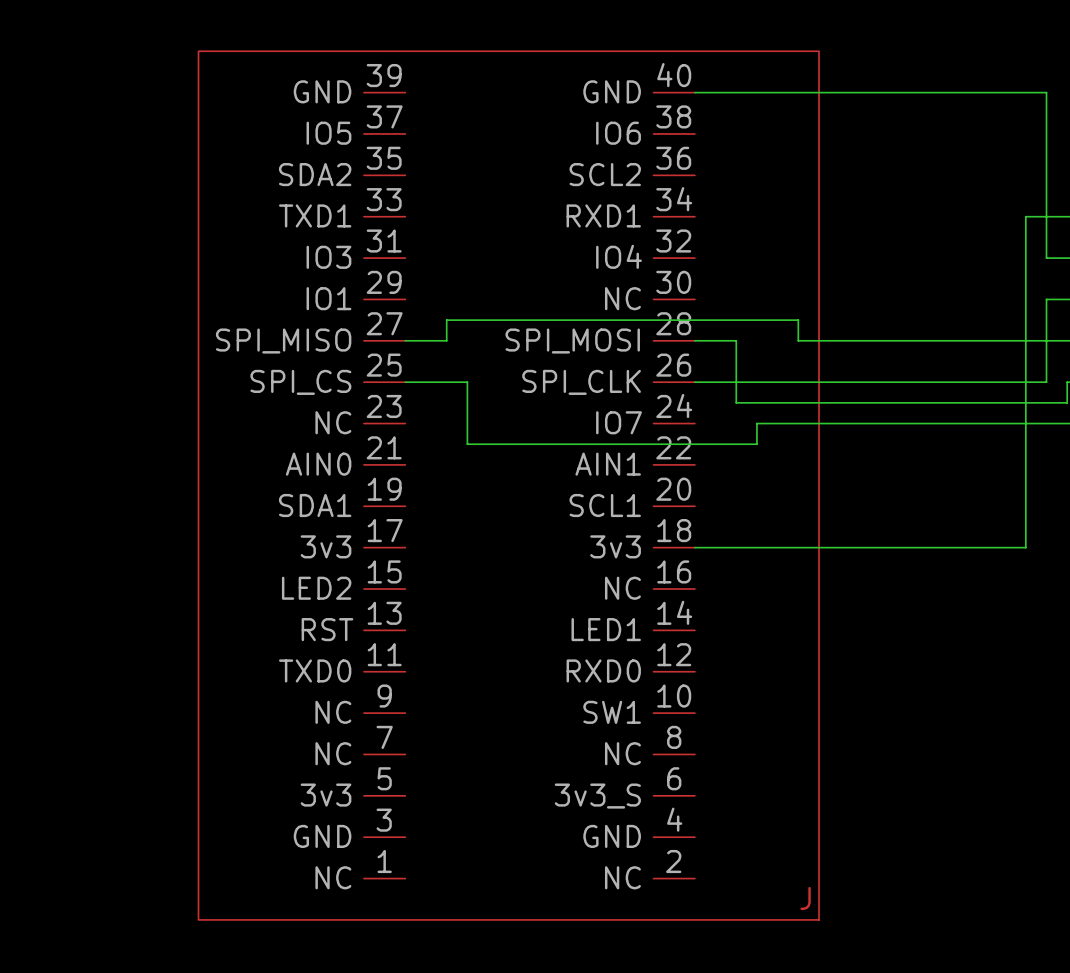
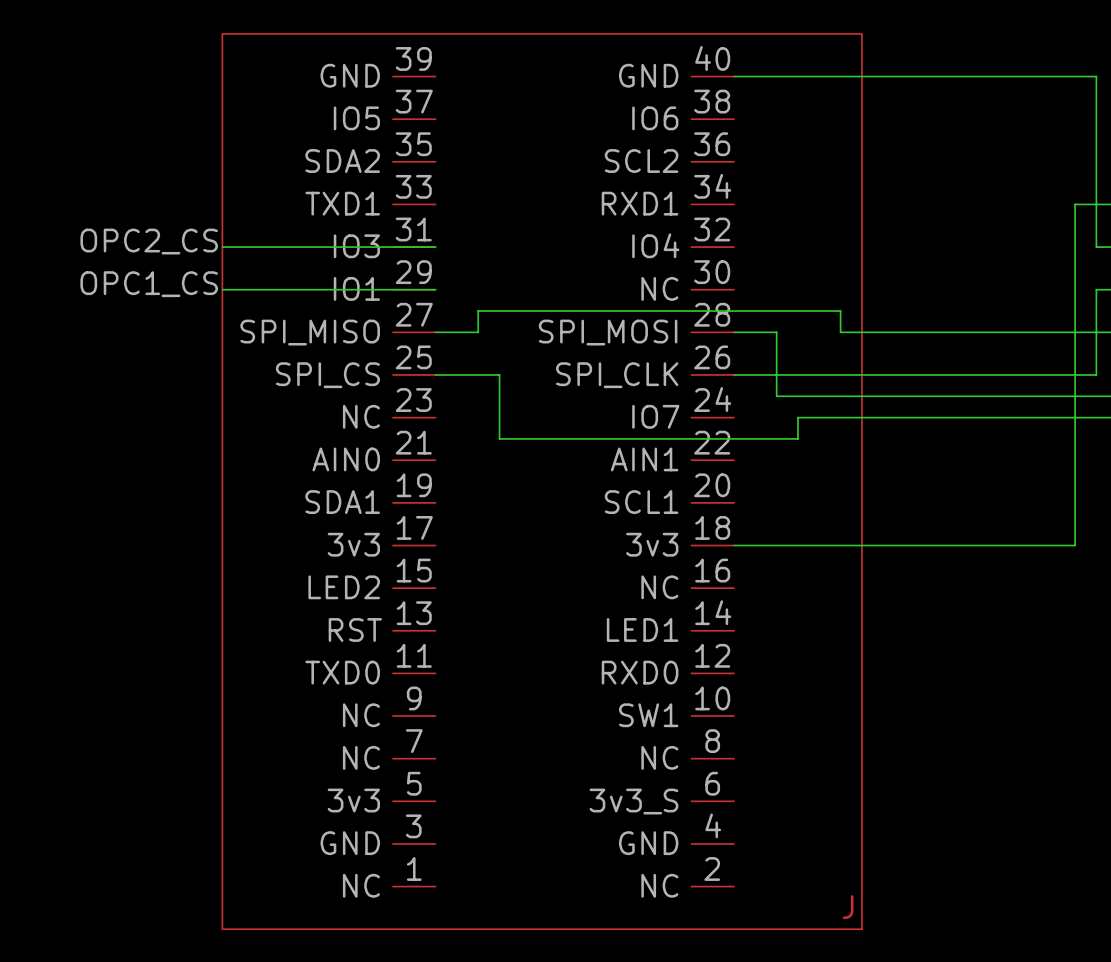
label: none -> OPC2_CS (149, 241)
wire: none -> (222, 247) (435, 247)
label: none -> OPC1_CS (149, 284)
wire: none -> (222, 289) (435, 289)

